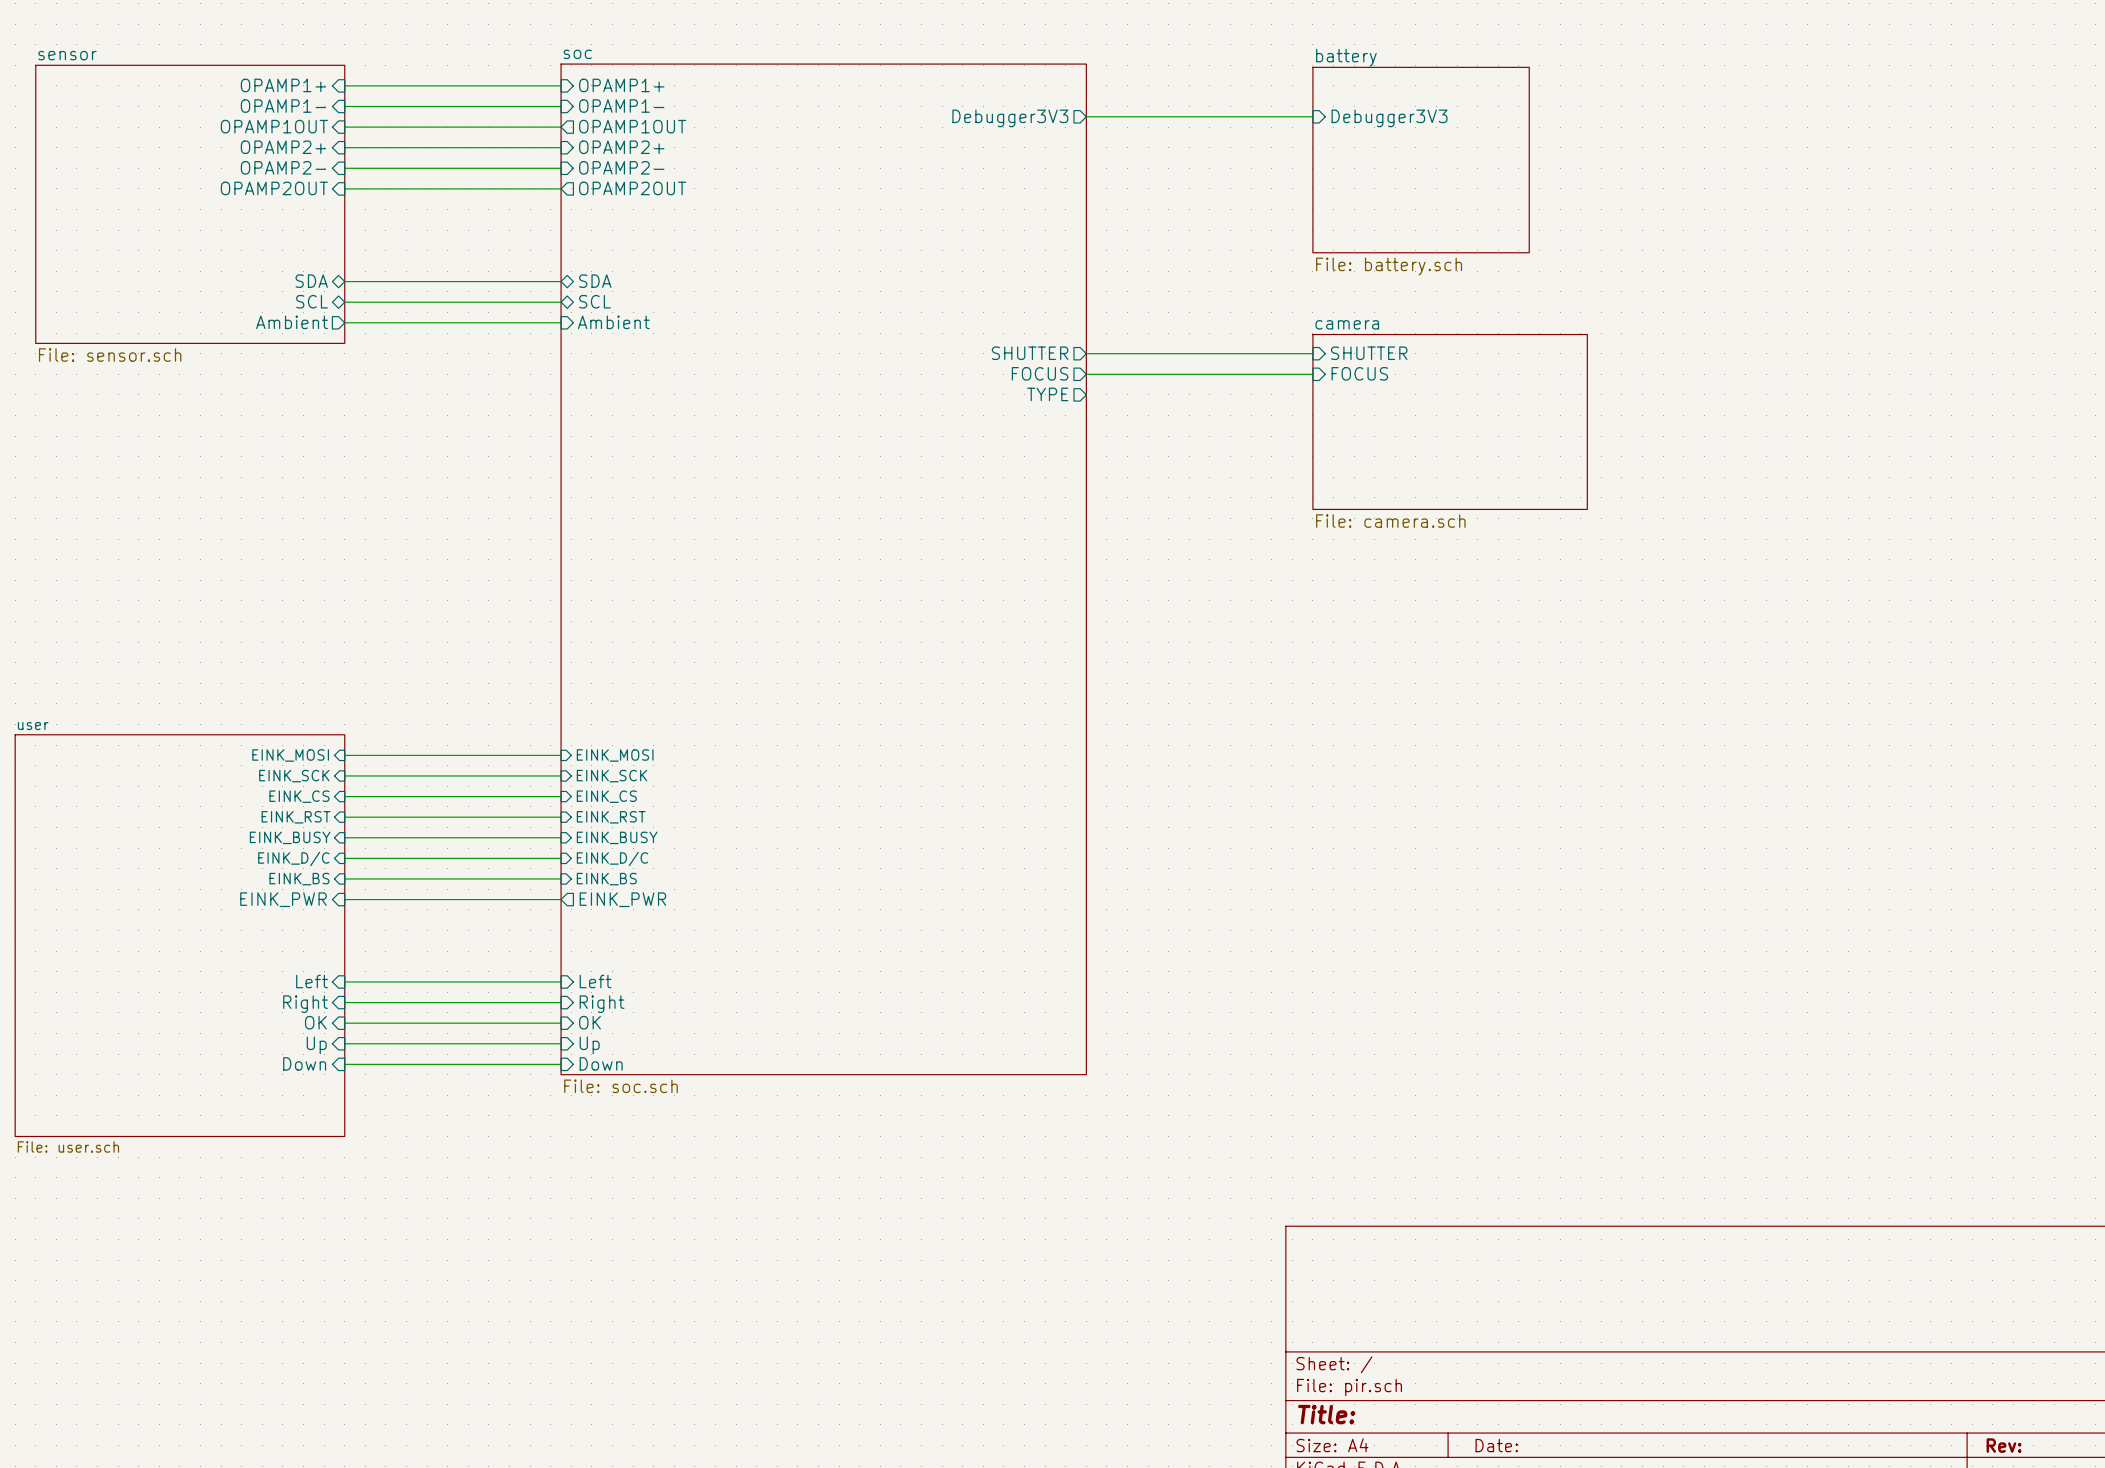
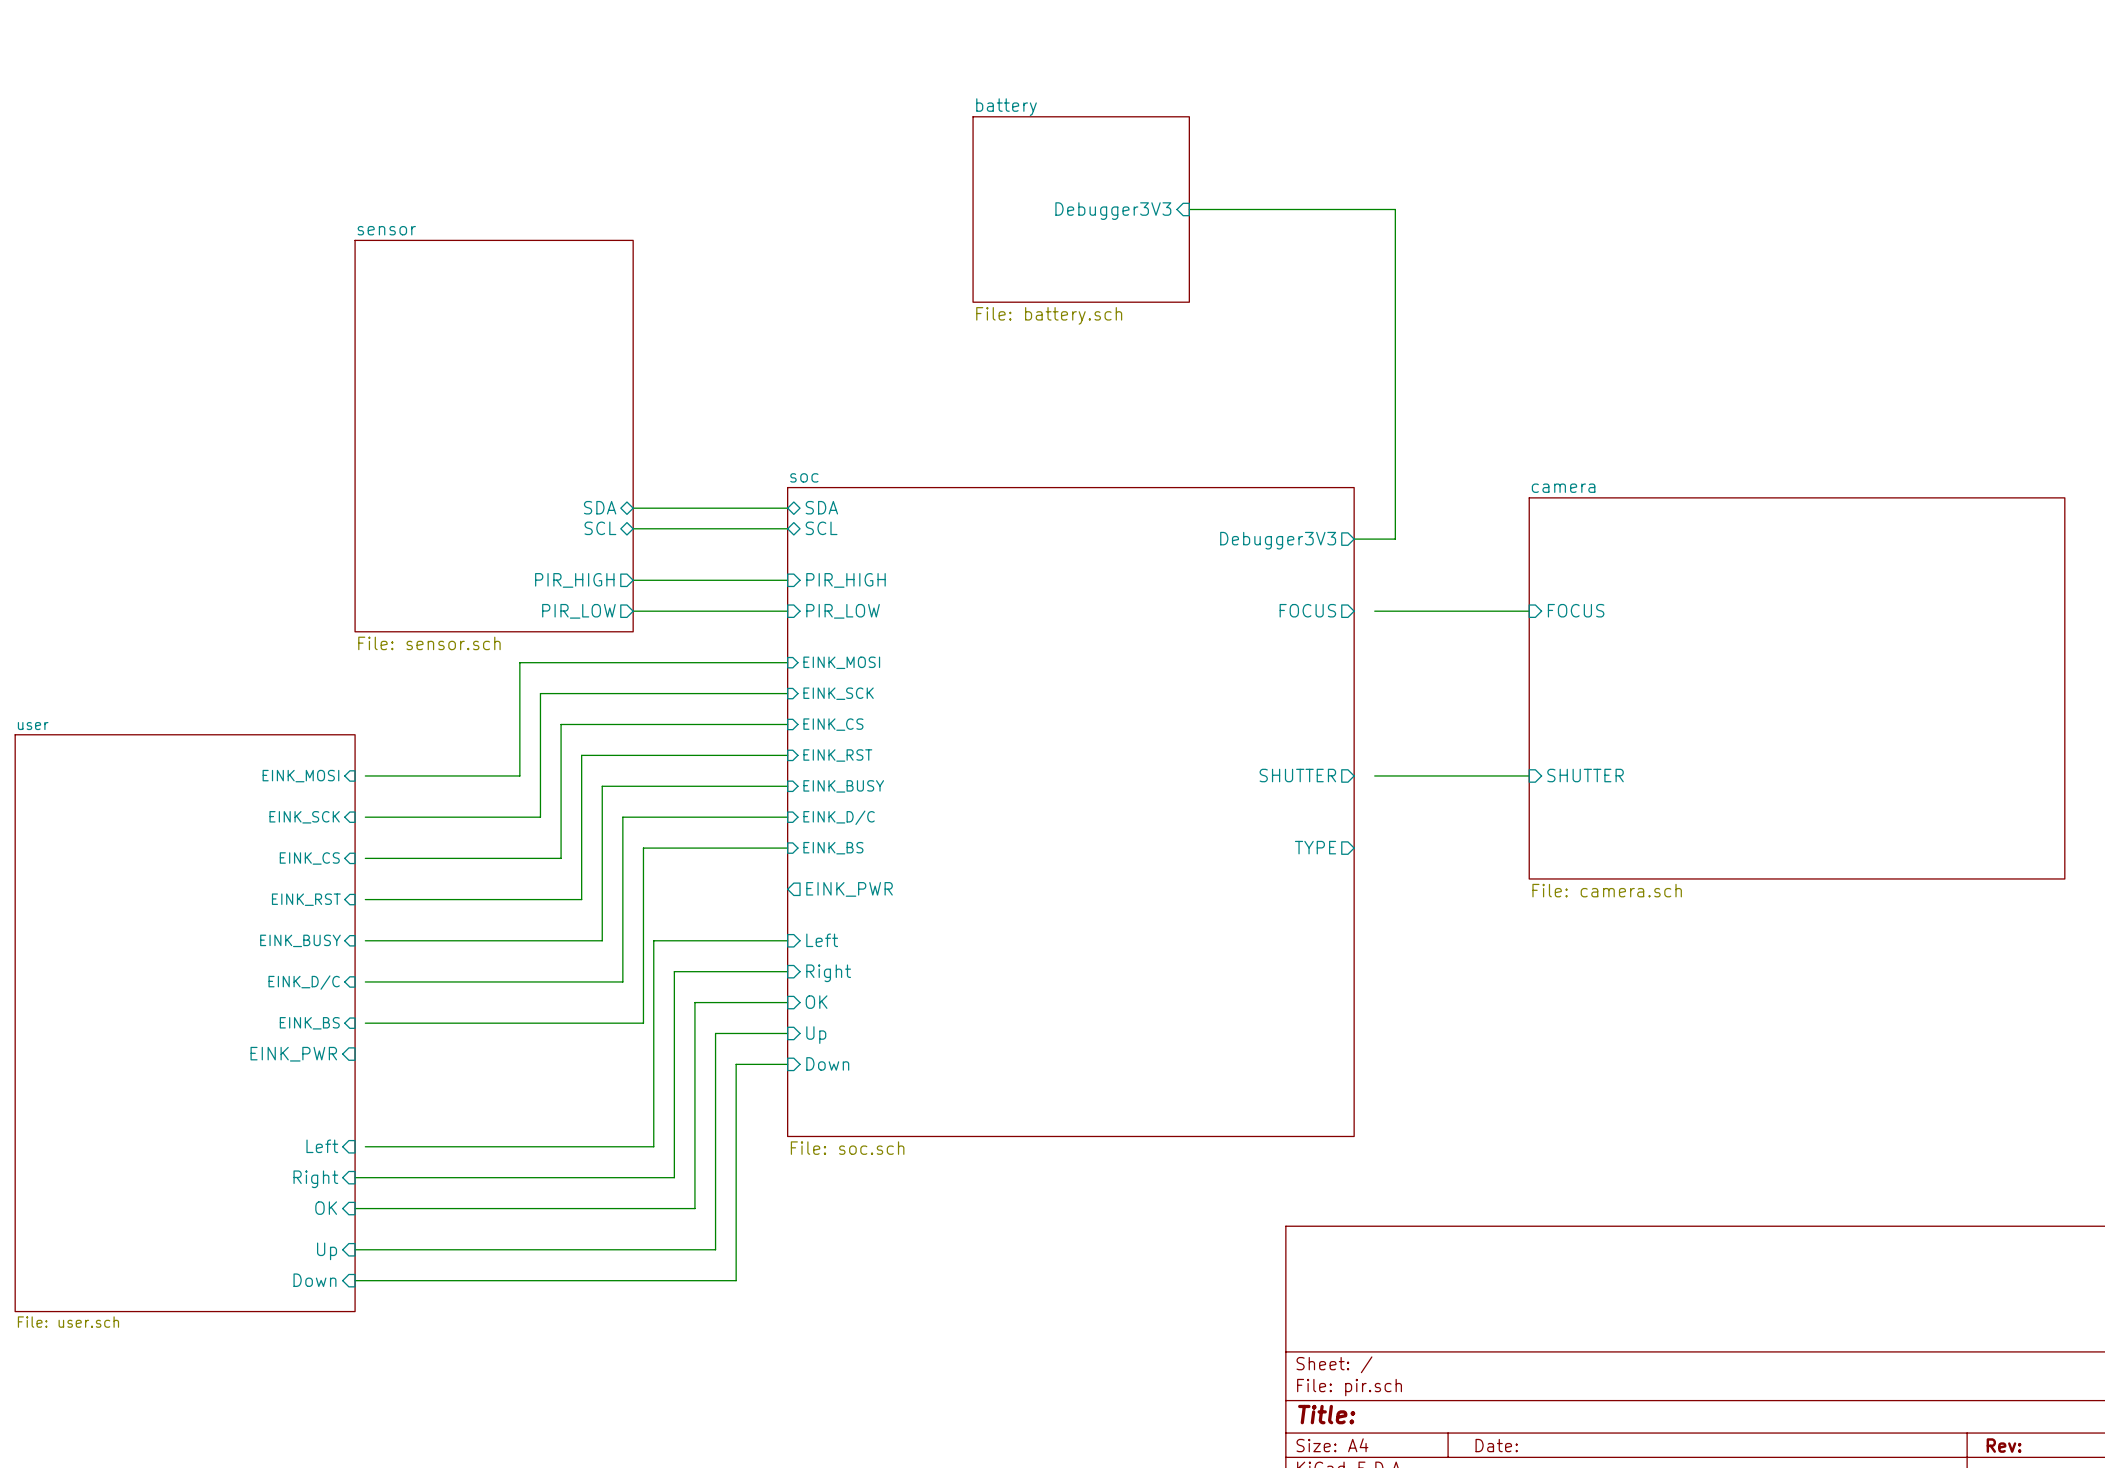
sheet pin: OPAMP1+ (283, 85) -> none
wire: (344, 85) (561, 85) -> none
sheet pin: OPAMP1+ (621, 85) -> none
sheet pin: OPAMP1- (283, 106) -> none
wire: (344, 106) (561, 106) -> none
sheet pin: OPAMP1- (621, 106) -> none
wire: (1086, 116) (1312, 116) -> none
sheet pin: Debugger3V3 (1010, 118) -> none
sheet pin: Debugger3V3 (1389, 118) -> none
sheet pin: OPAMP1OUT (274, 126) -> none
sheet pin: OPAMP1OUT (632, 126) -> none
wire: (344, 127) (561, 127) -> none
sheet pin: OPAMP2+ (283, 147) -> none
wire: (344, 147) (561, 147) -> none
sheet pin: OPAMP2+ (621, 147) -> none
sheet battery: File: battery.sch (1421, 160) -> none
sheet pin: OPAMP2- (283, 167) -> none
sheet pin: OPAMP2- (621, 167) -> none
wire: (344, 168) (561, 168) -> none
sheet pin: OPAMP2OUT (274, 188) -> none
wire: (344, 188) (561, 188) -> none
sheet pin: OPAMP2OUT (632, 188) -> none
sheet sensor: File: sensor.sch (190, 204) -> none
sheet battery: none -> File: battery.sch (1081, 209)
wire: none -> (1189, 209) (1395, 209) (1395, 539) (1354, 539)
sheet pin: none -> Debugger3V3 (1113, 211)
sheet pin: SDA (311, 281) -> none
wire: (344, 281) (561, 281) -> none
sheet pin: SDA (595, 281) -> none
sheet pin: SCL (312, 301) -> none
sheet pin: SCL (594, 301) -> none
wire: (344, 302) (561, 302) -> none
sheet pin: Ambient (292, 322) -> none
wire: (344, 322) (561, 322) -> none
sheet pin: Ambient (613, 322) -> none
sheet pin: SHUTTER (1030, 353) -> none
wire: (1086, 353) (1312, 353) -> none
sheet pin: SHUTTER (1369, 353) -> none
sheet pin: FOCUS (1040, 373) -> none
sheet pin: FOCUS (1359, 373) -> none
wire: (1086, 374) (1312, 374) -> none
sheet pin: TYPE (1047, 394) -> none
sheet camera: File: camera.sch (1450, 421) -> none
sheet sensor: none -> File: sensor.sch (494, 436)
sheet pin: none -> SDA (600, 507)
sheet pin: none -> SDA (821, 507)
wire: none -> (633, 508) (787, 508)
sheet pin: none -> SCL (600, 528)
wire: none -> (633, 528) (787, 528)
sheet pin: none -> SCL (821, 528)
sheet pin: none -> Debugger3V3 (1278, 540)
sheet soc: File: soc.sch (823, 569) -> none
sheet pin: none -> PIR_HIGH (574, 580)
wire: none -> (633, 580) (787, 580)
sheet pin: none -> PIR_HIGH (846, 580)
sheet pin: none -> FOCUS (1307, 610)
sheet pin: none -> FOCUS (1576, 610)
sheet pin: none -> PIR_LOW (578, 611)
wire: none -> (633, 611) (787, 611)
sheet pin: none -> PIR_LOW (843, 611)
wire: none -> (1374, 611) (1529, 611)
sheet pin: none -> EINK_MOSI (841, 662)
sheet camera: none -> File: camera.sch (1797, 688)
sheet pin: none -> EINK_SCK (838, 693)
wire: none -> (787, 724) (561, 724) (561, 858)
sheet pin: none -> EINK_CS (833, 724)
sheet pin position: EINK_MOSI (290, 755) -> EINK_MOSI (300, 776)
wire: (344, 755) (561, 755) -> none
sheet pin: EINK_MOSI (615, 755) -> none
wire: none -> (787, 755) (581, 755) (581, 899) (561, 899)
sheet pin: none -> EINK_RST (837, 755)
wire: (344, 775) (365, 775) -> none
wire: (519, 775) (561, 775) -> (519, 775) (519, 662) (787, 662)
sheet pin: none -> SHUTTER (1297, 775)
wire: none -> (1374, 775) (1529, 775)
sheet pin: none -> SHUTTER (1585, 775)
sheet pin position: EINK_SCK (294, 776) -> EINK_SCK (304, 817)
sheet pin: EINK_SCK (611, 776) -> none
wire: none -> (787, 786) (602, 786) (602, 940) (365, 940)
sheet pin: none -> EINK_BUSY (843, 786)
sheet pin position: EINK_CS (299, 796) -> EINK_CS (309, 858)
wire: (344, 796) (561, 796) -> none
sheet pin: EINK_CS (606, 796) -> none
sheet soc: none -> File: soc.sch (1070, 812)
sheet pin position: EINK_RST (296, 817) -> EINK_RST (306, 899)
wire: (344, 817) (365, 817) -> none
wire: (540, 817) (561, 817) -> (540, 817) (540, 693) (787, 693)
sheet pin: EINK_RST (611, 817) -> none
wire: none -> (787, 817) (622, 817) (622, 981) (561, 981)
sheet pin: none -> EINK_D/C (839, 817)
sheet pin position: EINK_BUSY (290, 837) -> EINK_BUSY (300, 940)
wire: (344, 837) (561, 837) -> none
sheet pin: EINK_BUSY (617, 837) -> none
sheet pin: none -> TYPE (1315, 847)
wire: none -> (787, 848) (643, 848) (643, 1023) (561, 1023)
sheet pin: none -> EINK_BS (833, 848)
sheet pin position: EINK_D/C (293, 858) -> EINK_D/C (304, 982)
wire: (344, 858) (365, 858) -> none
sheet pin: EINK_D/C (612, 858) -> none
wire: (344, 878) (561, 878) -> none
sheet pin: EINK_BS (299, 879) -> none
sheet pin: EINK_BS (606, 879) -> none
sheet pin: none -> EINK_PWR (849, 889)
sheet pin: EINK_PWR (283, 899) -> none
wire: (344, 899) (365, 899) -> none
sheet pin: EINK_PWR (622, 899) -> none
sheet user: File: user.sch (179, 935) -> none
wire: none -> (787, 940) (653, 940) (653, 1146) (365, 1146)
sheet pin: none -> Left (822, 940)
wire: none -> (787, 971) (674, 971) (674, 1177) (355, 1177)
sheet pin: none -> Right (828, 973)
sheet pin: Left (312, 981) -> none
wire: (344, 981) (365, 981) -> none
sheet pin: Left (595, 981) -> none
wire: (344, 1002) (561, 1002) -> none
wire: none -> (787, 1002) (694, 1002) (694, 1208) (355, 1208)
sheet pin: none -> OK (816, 1002)
sheet pin: Right (305, 1004) -> none
sheet pin: Right (602, 1004) -> none
sheet pin: OK (315, 1022) -> none
sheet pin: OK (589, 1022) -> none
sheet user: none -> File: user.sch (185, 1023)
sheet pin: none -> EINK_BS (309, 1023)
wire: (344, 1023) (365, 1023) -> none
wire: none -> (787, 1033) (715, 1033) (715, 1249) (355, 1249)
sheet pin: none -> Up (816, 1035)
wire: (344, 1043) (561, 1043) -> none
sheet pin: Up (316, 1045) -> none
sheet pin: Up (589, 1045) -> none
sheet pin: none -> EINK_PWR (293, 1054)
sheet pin: Down (304, 1063) -> none
sheet pin: Down (601, 1063) -> none
sheet pin: none -> Down (827, 1063)
wire: (344, 1064) (561, 1064) -> none
wire: none -> (787, 1064) (736, 1064) (736, 1280) (355, 1280)
sheet pin: none -> Left (322, 1146)
sheet pin: none -> Right (315, 1179)
sheet pin: none -> OK (326, 1208)
sheet pin: none -> Up (327, 1251)
sheet pin: none -> Down (314, 1280)

